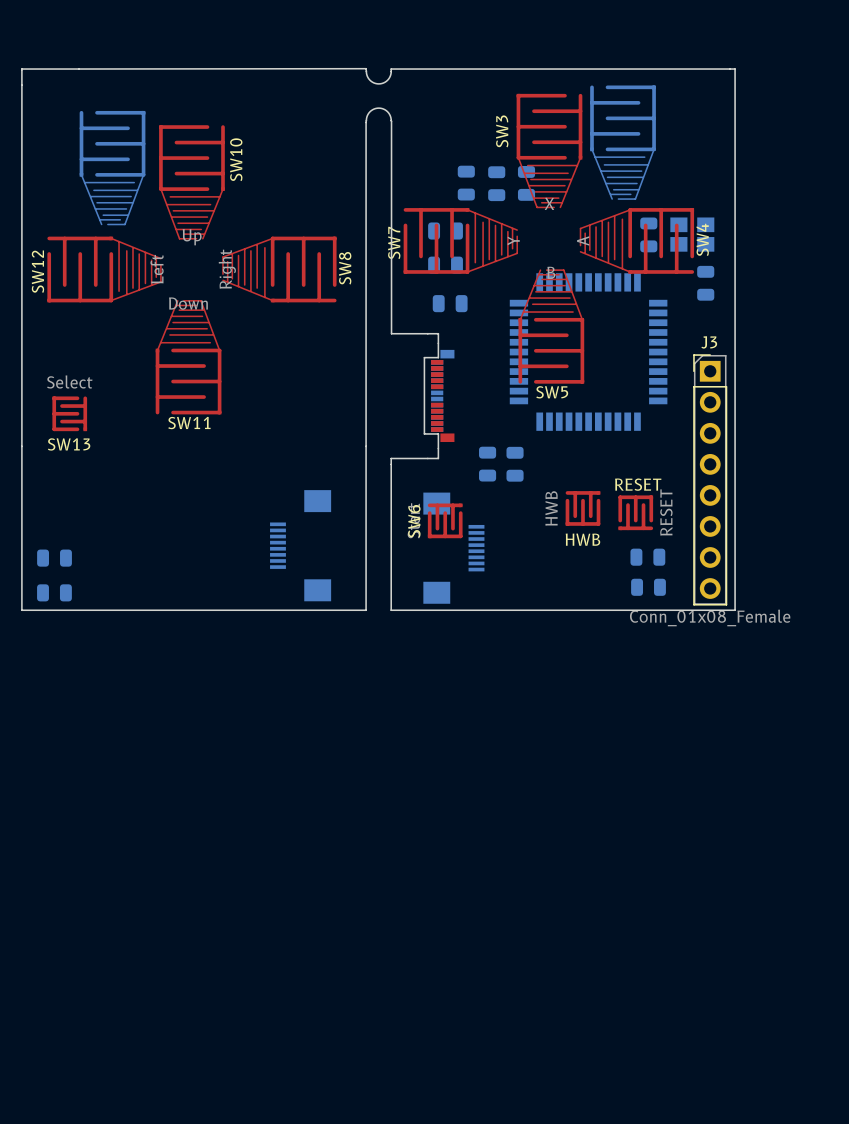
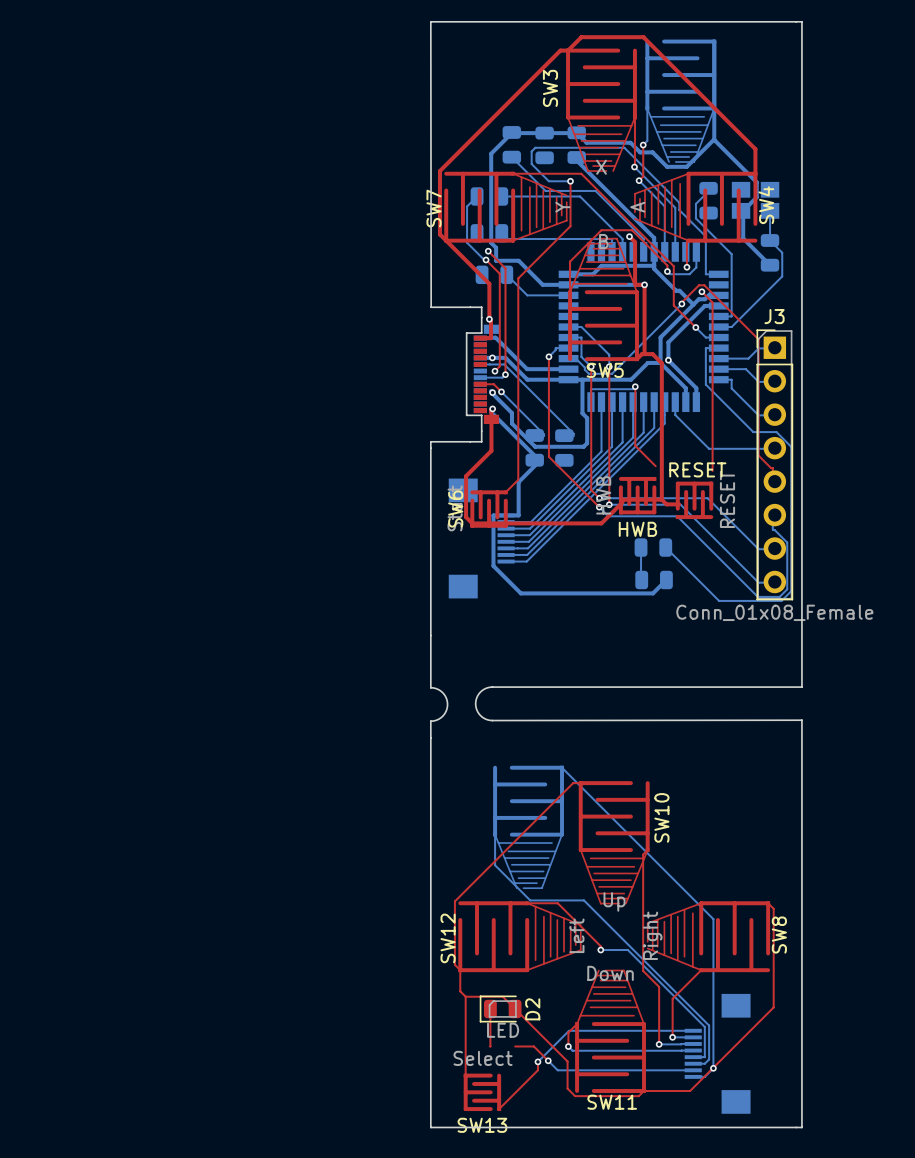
board edge: (391, 69) (388, 79) (378, 83) (368, 79) (366, 68) (21, 69) (21, 610) (366, 610) (366, 122) (370, 111) (378, 108) (387, 111) (391, 121) (391, 333) -> (430, 21) (431, 307)
board edge: (735, 69) (735, 610) (391, 610) -> (801, 21) (801, 687) (492, 687) (480, 691) (475, 703) (480, 715) (492, 720) (801, 720) (801, 1127) (430, 1127) (430, 721) (442, 716) (447, 704) (442, 692) (430, 687) (430, 605)
bottom track: none -> (714, 41) (714, 139) (686, 166) (667, 166) (652, 152) (640, 152) (630, 142) (586, 142) (576, 132) (511, 133)
bottom track: none -> (647, 108) (647, 140) (643, 145)
top track: none -> (634, 117) (634, 167)
part: (112, 168) -> none
bottom track: none -> (511, 133) (491, 153) (491, 242) (496, 247) (496, 260) (518, 260) (542, 284) (644, 284)
bottom track: none -> (713, 139) (756, 182) (756, 197) (743, 210) (743, 238) (769, 265)
SW10 position: (191, 182) -> (614, 842)
top track: none -> (643, 145) (643, 176) (639, 180)
via: none -> (643, 145)
bottom track: none -> (511, 157) (545, 190) (595, 190) (643, 239) (643, 251)
bottom track: none -> (576, 157) (576, 160) (654, 238) (654, 268) (693, 304)
bottom track: none -> (634, 167) (675, 207) (675, 251)
via: none -> (634, 167)
top track: none -> (513, 173) (581, 173) (673, 266) (673, 305) (695, 327)
top track: none -> (755, 173) (755, 149) (643, 37) (581, 37) (568, 50) (560, 50) (439, 171) (439, 234) (489, 283) (490, 338) (480, 338)
bottom track: none -> (570, 181) (548, 181) (531, 164) (531, 151) (535, 147) (624, 147) (679, 202) (679, 209) (705, 236) (705, 274) (718, 274)
top track: none -> (570, 181) (570, 226) (518, 278) (518, 479) (505, 492)
via: none -> (570, 181)
bottom track: none -> (639, 180) (664, 206) (664, 251)
via: none -> (639, 180)
bottom track: none -> (708, 188) (710, 189) (695, 203) (695, 218) (731, 254) (731, 316) (718, 316)
bottom track: none -> (477, 196) (467, 206) (467, 242) (486, 259)
bottom track: none -> (501, 196) (580, 196) (622, 239) (622, 251)
bottom track: none -> (770, 210) (770, 240)
bottom track: none -> (501, 233) (507, 239) (612, 239) (612, 251)
top track: none -> (629, 236) (635, 242) (635, 283) (644, 284) (644, 354)
via: none -> (629, 236)
SW12 position: (104, 269) -> (519, 936)
SW8 position: (279, 269) -> (708, 936)
top track: none -> (688, 240) (686, 267)
bottom track: none -> (769, 240) (782, 252) (782, 276) (731, 327) (718, 327)
top track: none -> (488, 251) (505, 268) (505, 374)
via: none -> (488, 251)
bottom track: none -> (696, 251) (696, 267) (689, 274) (670, 274) (667, 271)
top track: none -> (486, 259) (499, 273) (499, 366) (494, 371)
via: none -> (486, 259)
bottom track: none -> (654, 265) (601, 265) (593, 274) (568, 274)
via: none -> (686, 267)
top track: none -> (667, 271) (667, 265) (632, 230) (601, 230) (570, 261) (570, 292)
via: none -> (667, 271)
bottom track: none -> (506, 274) (527, 295) (568, 295)
via: none -> (644, 284)
top track: none -> (701, 291) (712, 302) (712, 470)
via: none -> (701, 291)
bottom track: none -> (718, 295) (708, 295) (704, 299) (698, 299) (660, 337) (660, 362)
bottom track: none -> (681, 303) (611, 373) (588, 373) (575, 358) (568, 358)
top track: none -> (681, 303) (698, 285) (704, 285) (758, 339) (758, 455) (772, 468) (772, 482)
via: none -> (681, 303)
bottom track: none -> (718, 305) (704, 305) (668, 342) (668, 360) (696, 388) (696, 402)
via: none -> (489, 319)
bottom track: none -> (568, 327) (581, 327) (609, 354) (609, 366)
bottom track: none -> (695, 327) (705, 337) (718, 337)
via: none -> (695, 327)
SW11 position: (188, 357) -> (610, 1031)
bottom track: none -> (568, 337) (581, 337) (581, 356) (591, 366)
bottom track: none -> (480, 338) (495, 337) (527, 369) (568, 369)
bottom track: none -> (568, 348) (555, 348) (548, 356)
bottom track: none -> (718, 348) (705, 348) (705, 384) (753, 432) (776, 432) (791, 446) (791, 591) (781, 600) (719, 600) (665, 547)
bottom track: none -> (772, 348) (758, 348) (748, 358) (718, 358)
top track: none -> (548, 356) (548, 456) (599, 507)
via: none -> (548, 356)
bottom track: none -> (480, 357) (505, 357) (527, 379) (631, 379) (647, 362) (660, 362)
via: none -> (492, 357)
top track: none -> (636, 359) (641, 354) (652, 354) (661, 363) (661, 499)
via: none -> (668, 360)
bottom track: none -> (660, 362) (685, 388) (685, 402)
bottom track: none -> (480, 364) (504, 364) (573, 433) (573, 436)
top track: none -> (591, 366) (591, 489) (599, 498)
via: none -> (591, 366)
top track: none -> (609, 366) (609, 504)
via: none -> (609, 366)
bottom track: none -> (718, 369) (745, 369) (758, 381) (772, 381)
via: none -> (494, 371)
bottom track: none -> (505, 374) (502, 377) (480, 377)
via: none -> (505, 374)
bottom track: none -> (582, 379) (582, 413) (587, 418) (587, 443) (583, 446) (535, 446) (511, 423) (511, 413) (490, 391)
bottom track: none -> (718, 379) (731, 379) (731, 388) (758, 415) (772, 415)
top track: none -> (480, 384) (493, 384) (501, 391)
bottom track: none -> (635, 386) (632, 389) (590, 389) (590, 402)
top track: none -> (635, 386) (635, 445) (655, 466)
via: none -> (635, 386)
via: none -> (492, 392)
bottom track: none -> (501, 391) (544, 436)
via: none -> (501, 391)
SW13 position: (69, 413) -> (482, 1092)
bottom track: none -> (601, 402) (601, 451) (531, 522) (506, 522)
bottom track: none -> (612, 402) (612, 446) (530, 528) (506, 528)
bottom track: none -> (622, 402) (622, 442) (529, 535) (506, 535)
bottom track: none -> (633, 402) (633, 437) (528, 541) (506, 541)
bottom track: none -> (643, 402) (643, 432) (527, 548) (506, 548)
bottom track: none -> (654, 402) (654, 427) (527, 554) (506, 554)
bottom track: none -> (664, 402) (664, 423) (526, 561) (506, 561)
bottom track: none -> (675, 402) (675, 414) (709, 448) (772, 448)
bottom track: none -> (492, 408) (490, 411) (539, 460) (518, 482) (518, 515) (493, 515) (493, 565) (520, 593) (653, 593) (666, 580)
top track: none -> (492, 408) (490, 410) (491, 450) (466, 476) (466, 517) (472, 523)
via: none -> (492, 408)
bottom track: none -> (599, 498) (707, 498) (758, 549) (772, 549)
via: none -> (599, 498)
top track: none -> (661, 499) (666, 504) (679, 504)
top track: none -> (661, 499) (622, 499) (622, 502) (601, 523) (472, 523)
bottom track: none -> (609, 504) (680, 504) (758, 582) (772, 582)
via: none -> (609, 504)
bottom track: none -> (599, 507) (608, 516) (677, 516) (757, 596) (779, 596) (787, 589) (787, 542) (772, 529) (772, 515)
via: none -> (599, 507)
part: (300, 545) -> none
part position: (453, 548) -> (481, 538)
bottom track: none -> (641, 547) (641, 580)
part: none -> (653, 547)
part: (647, 557) -> none
part: (54, 558) -> none
part: none -> (654, 580)
part: (648, 587) -> none
part: (54, 592) -> none
bottom track: none -> (562, 767) (713, 919) (713, 1068) (704, 1076) (693, 1076)
top track: none -> (580, 783) (573, 783) (454, 901) (454, 964) (460, 970) (460, 991) (465, 996)
part: none -> (528, 827)
bottom track: none -> (495, 834) (495, 865) (530, 900) (584, 900) (709, 1025) (709, 1059) (704, 1063) (693, 1063)
top track: none -> (647, 850) (643, 854) (643, 970) (659, 986) (659, 1044)
top track: none -> (527, 903) (557, 903) (600, 946) (600, 950)
top track: none -> (768, 903) (773, 908) (773, 1007) (690, 1090) (644, 1090) (638, 1096) (575, 1096) (567, 1088) (567, 1061) (502, 996) (465, 996)
bottom track: none -> (600, 950) (627, 950) (704, 1026) (704, 1057) (693, 1057)
via: none -> (600, 950)
top track: none -> (701, 970) (672, 998) (672, 1037)
top track: none -> (465, 996) (465, 1075)
top track: none -> (490, 1009) (490, 1046)
D2: none -> LED (500, 1009)
top track: none -> (577, 1024) (568, 1032) (568, 1046)
bottom track: none -> (693, 1030) (569, 1030) (537, 1061)
bottom track: none -> (672, 1037) (693, 1037)
via: none -> (672, 1037)
bottom track: none -> (693, 1043) (659, 1044)
via: none -> (659, 1044)
top track: none -> (515, 1046) (533, 1046) (548, 1060)
bottom track: none -> (568, 1046) (572, 1050) (693, 1050)
via: none -> (568, 1046)
part: none -> (717, 1053)
bottom track: none -> (548, 1060) (557, 1070) (693, 1070)
via: none -> (548, 1060)
top track: none -> (537, 1061) (537, 1070) (499, 1109)
via: none -> (537, 1061)
via: none -> (713, 1068)

